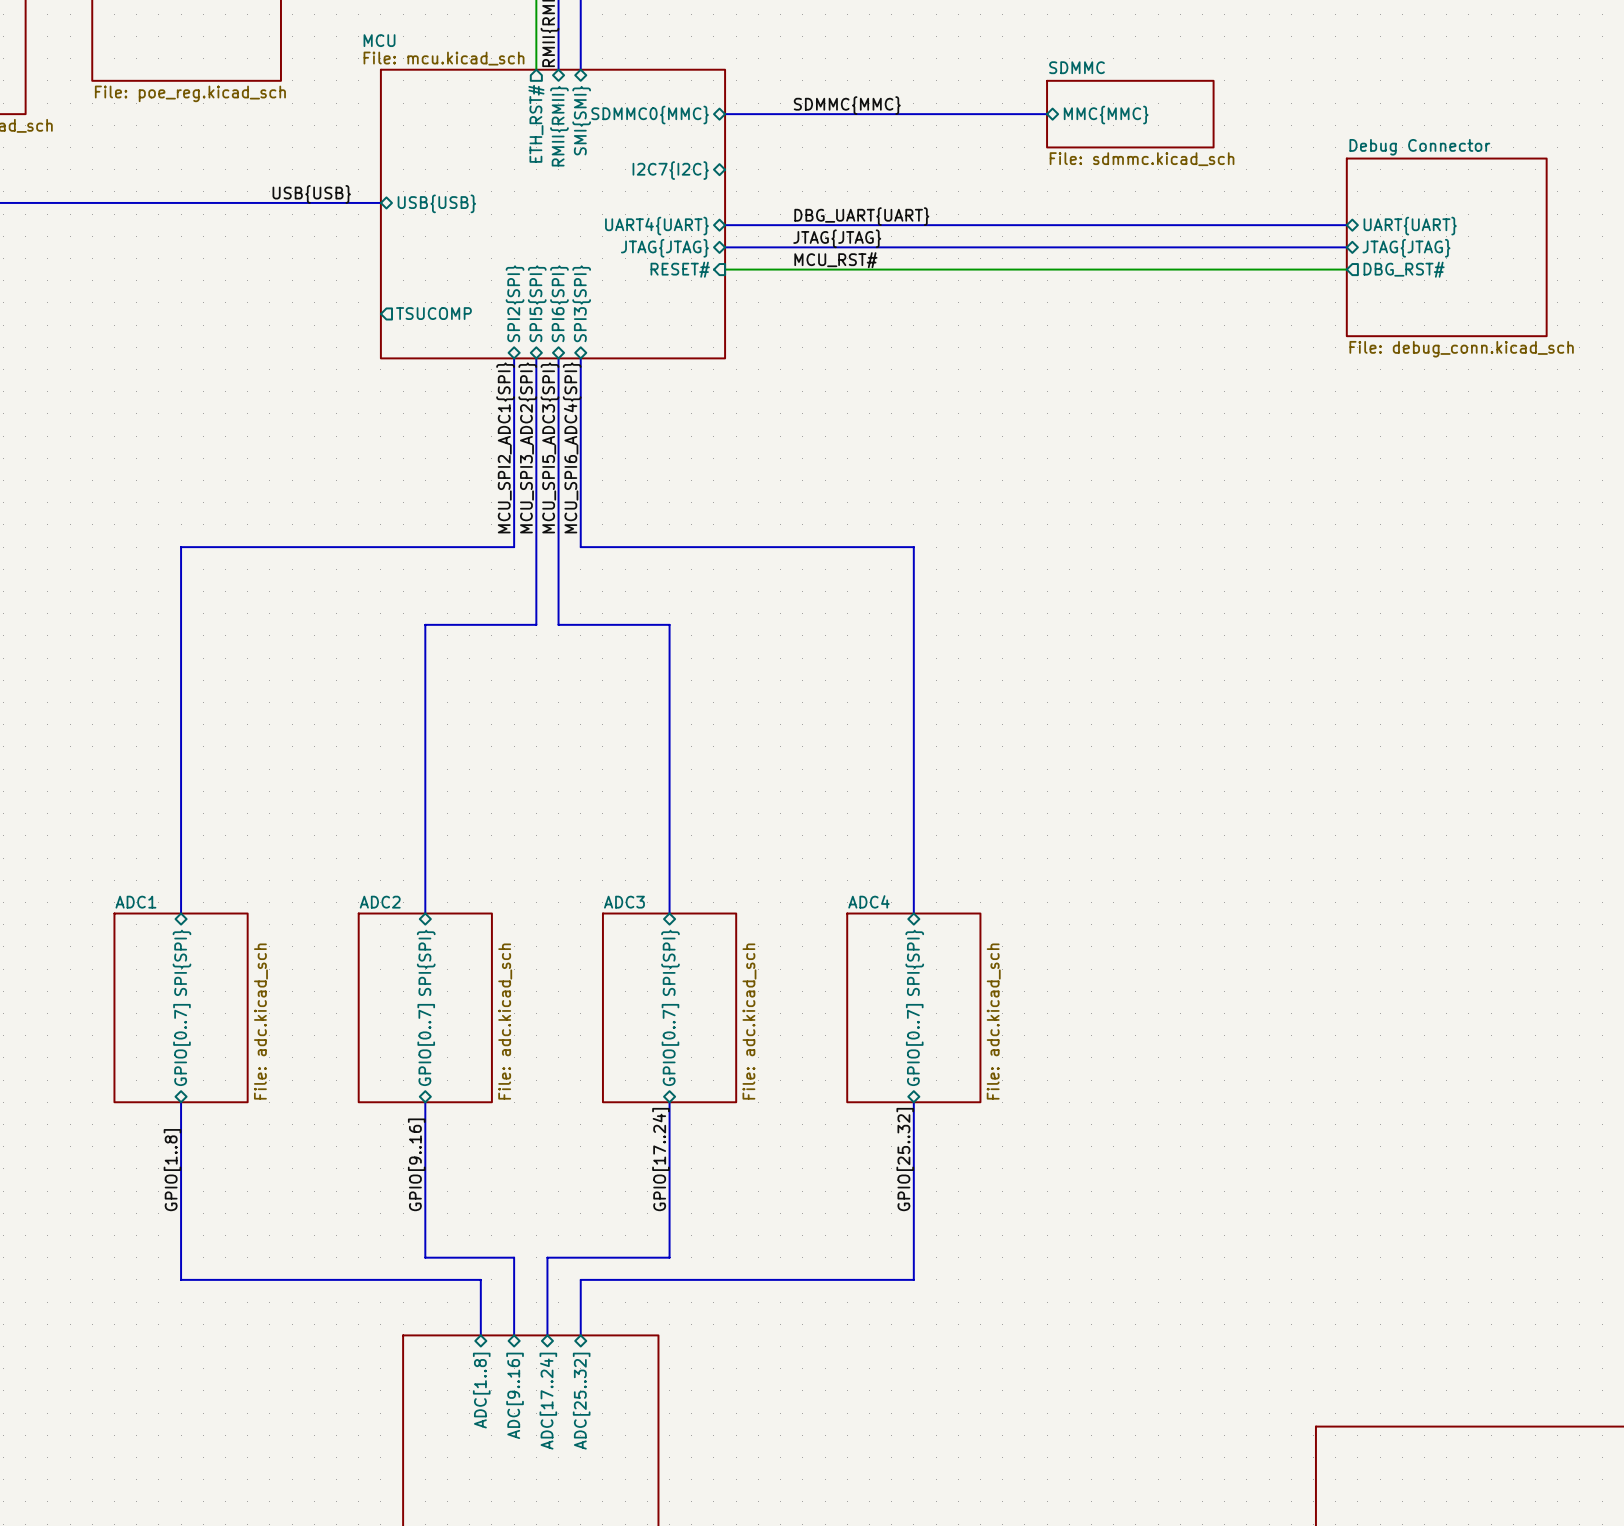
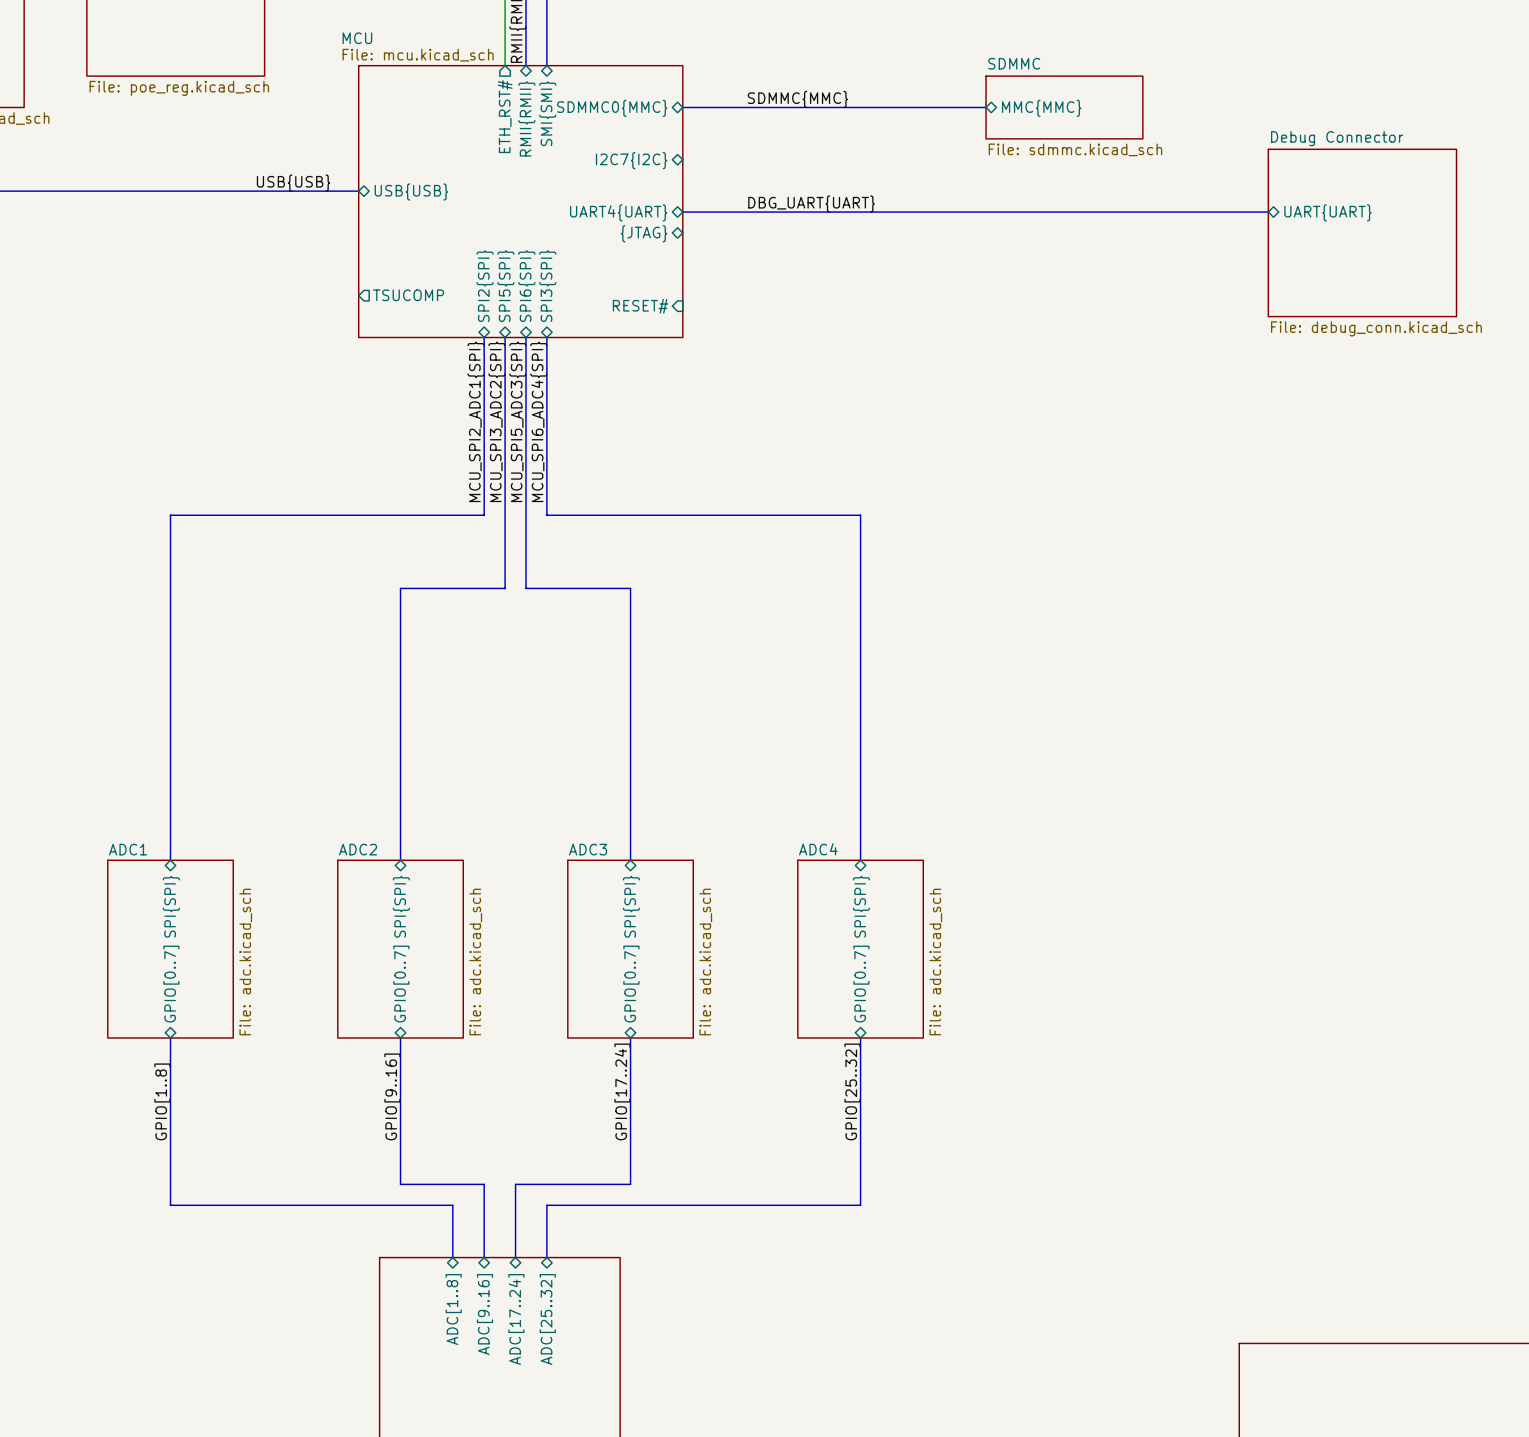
label: JTAG{JTAG} (837, 238) -> none
bus: (725, 247) (1346, 247) -> none
sheet pin: JTAG{JTAG} (664, 248) -> {JTAG} (644, 233)
sheet pin: JTAG{JTAG} (1406, 248) -> none
label: MCU_RST# (835, 260) -> none
sheet pin position: RESET# (680, 269) -> RESET# (640, 306)
wire: (725, 269) (1346, 269) -> none
sheet pin: DBG_RST# (1404, 269) -> none

